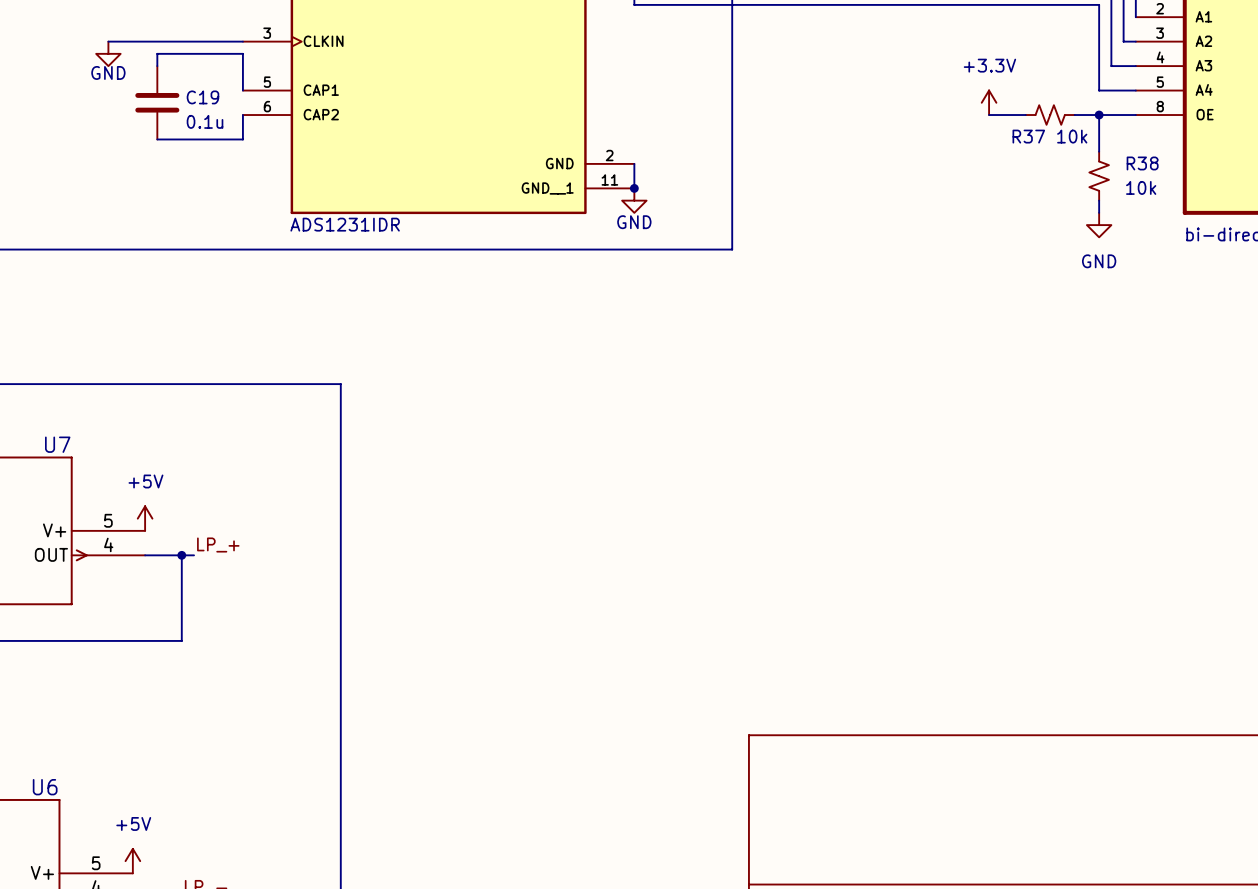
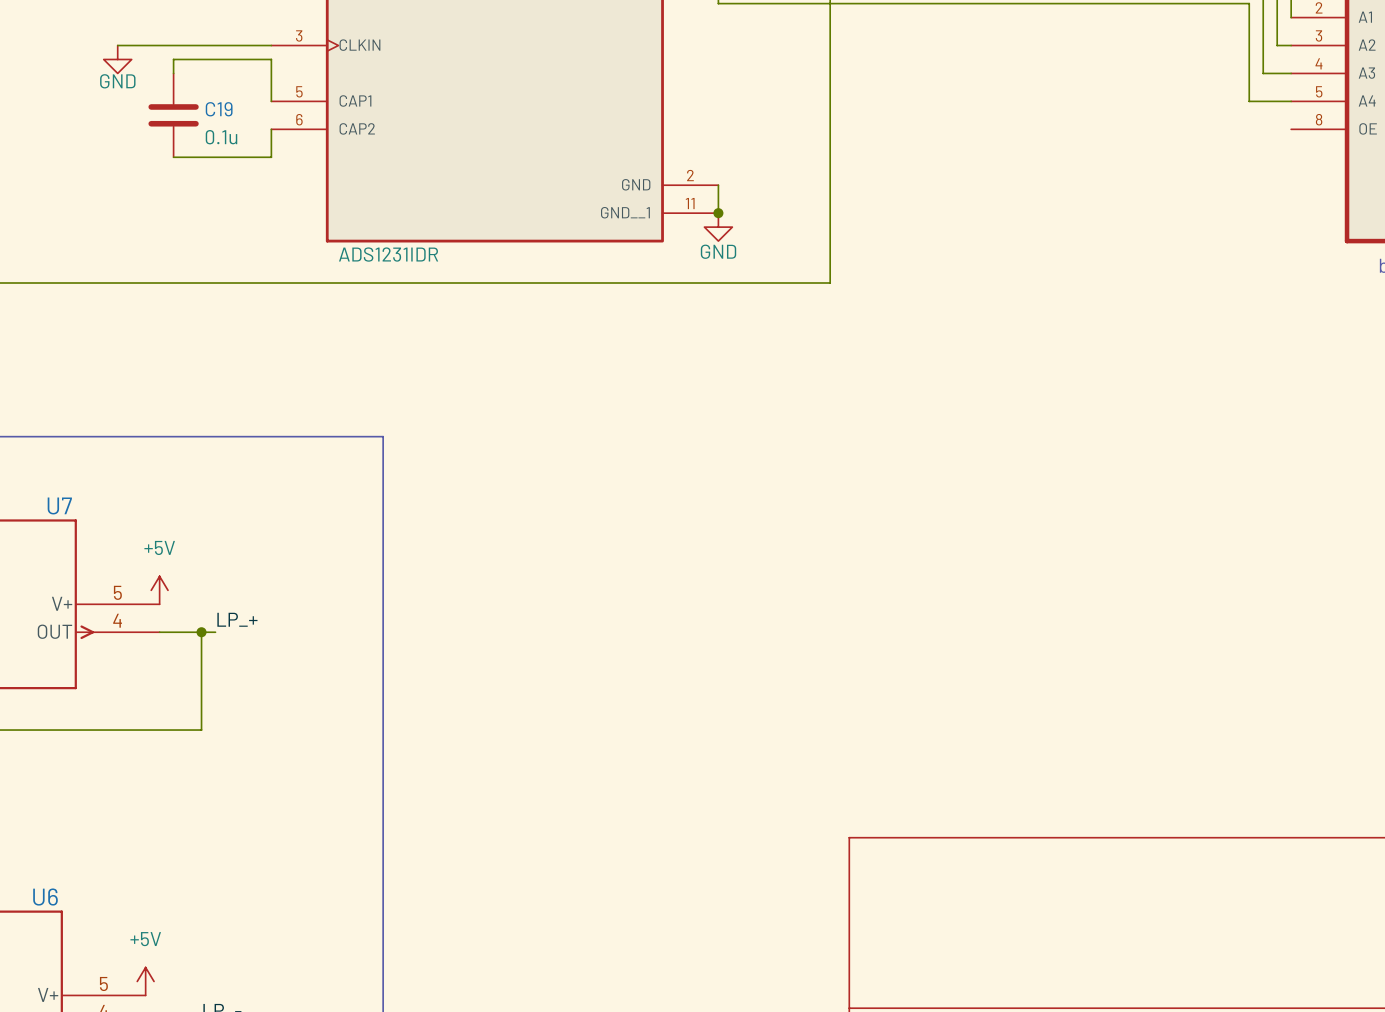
power symbol: +3.3V (989, 102) -> none
wire: (989, 115) (1025, 115) -> none
R37: 10k (1050, 115) -> none
wire: (1074, 115) (1135, 115) -> none
wire: (1099, 115) (1099, 151) -> none
junction: (1099, 115) -> none
R38: 10k (1099, 176) -> none
wire: (1099, 200) (1099, 212) -> none
power symbol: GND (1099, 225) -> none

